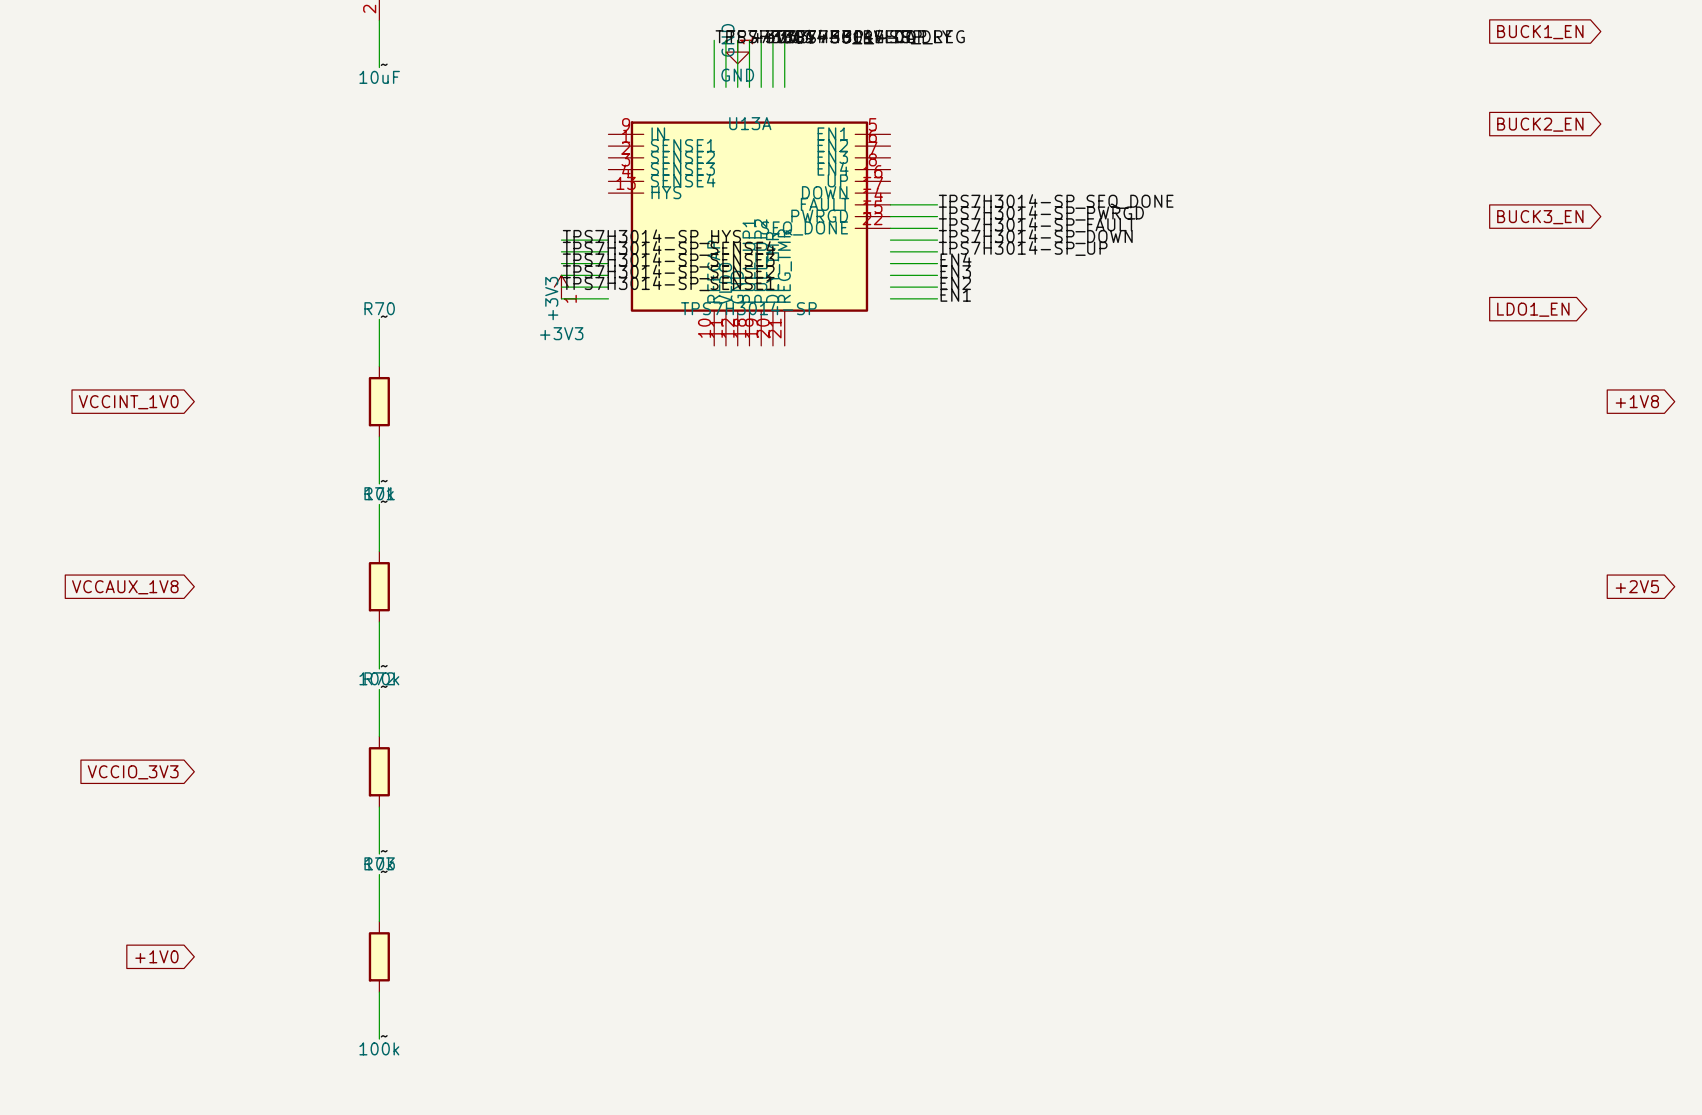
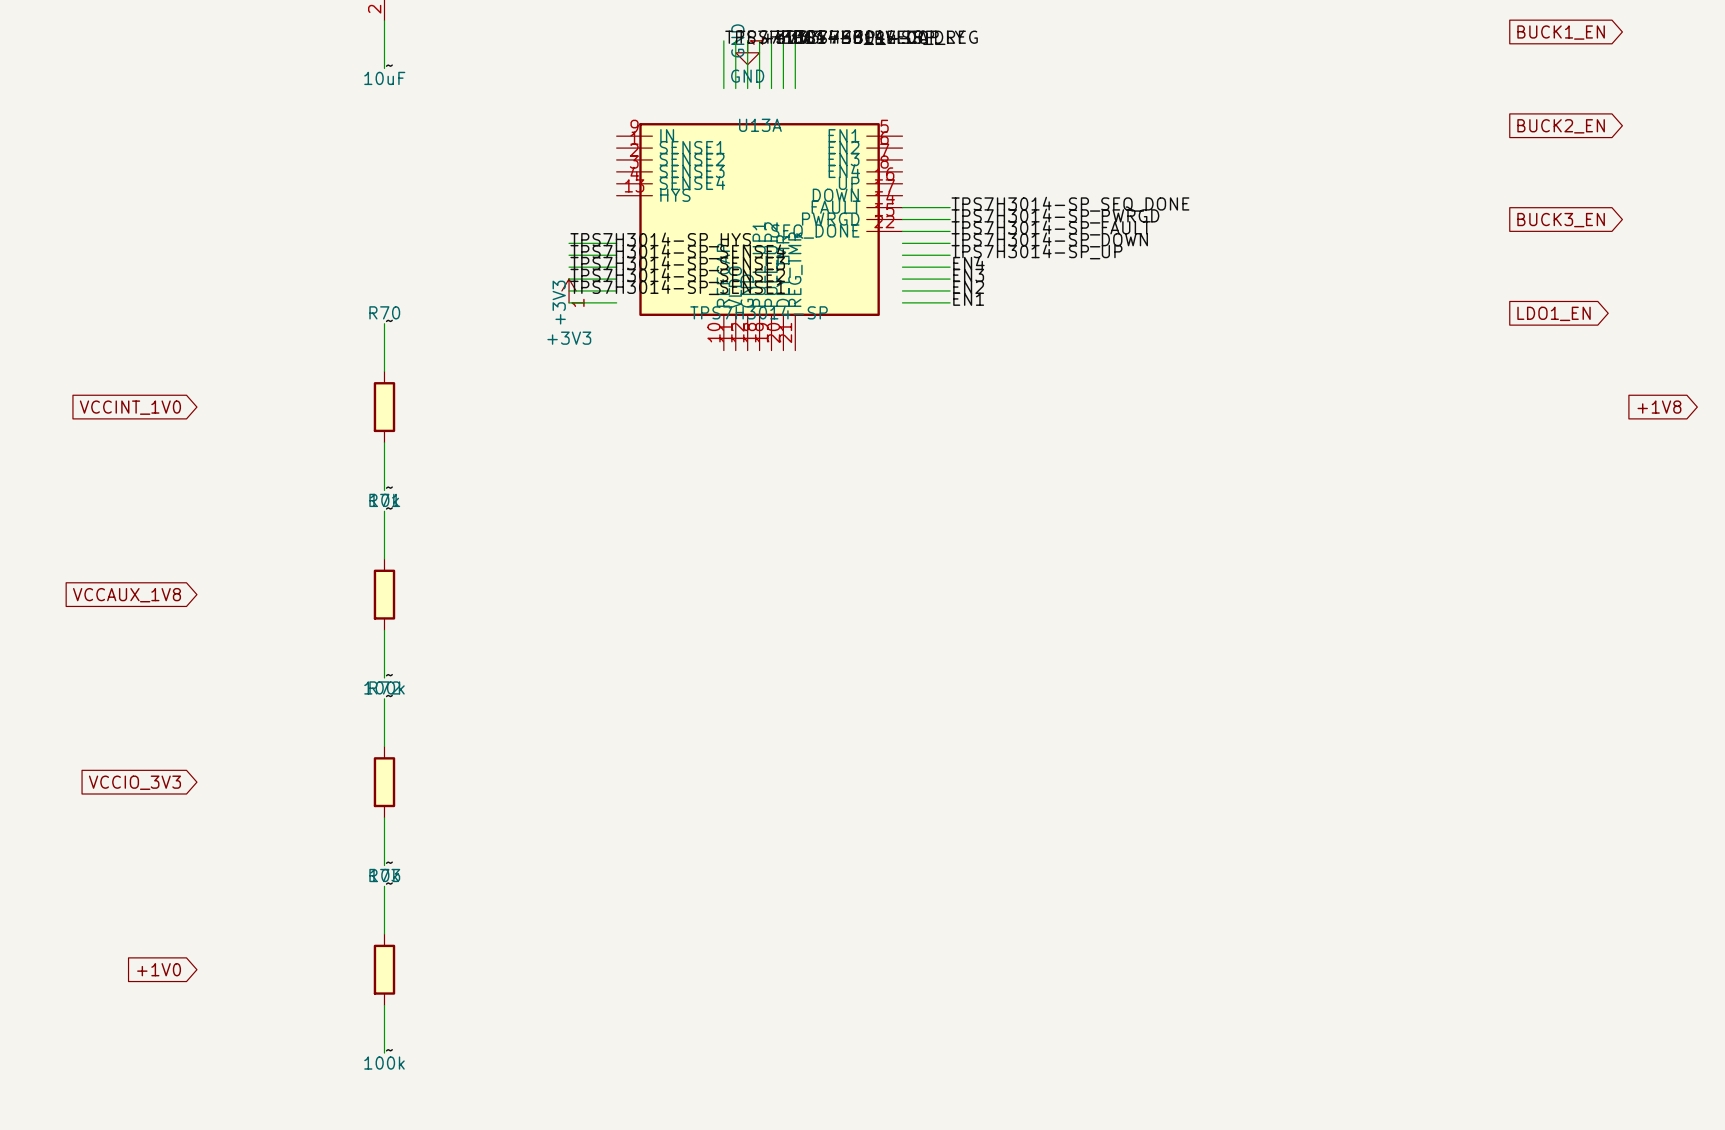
global label: +2V5 (1637, 586) -> none

